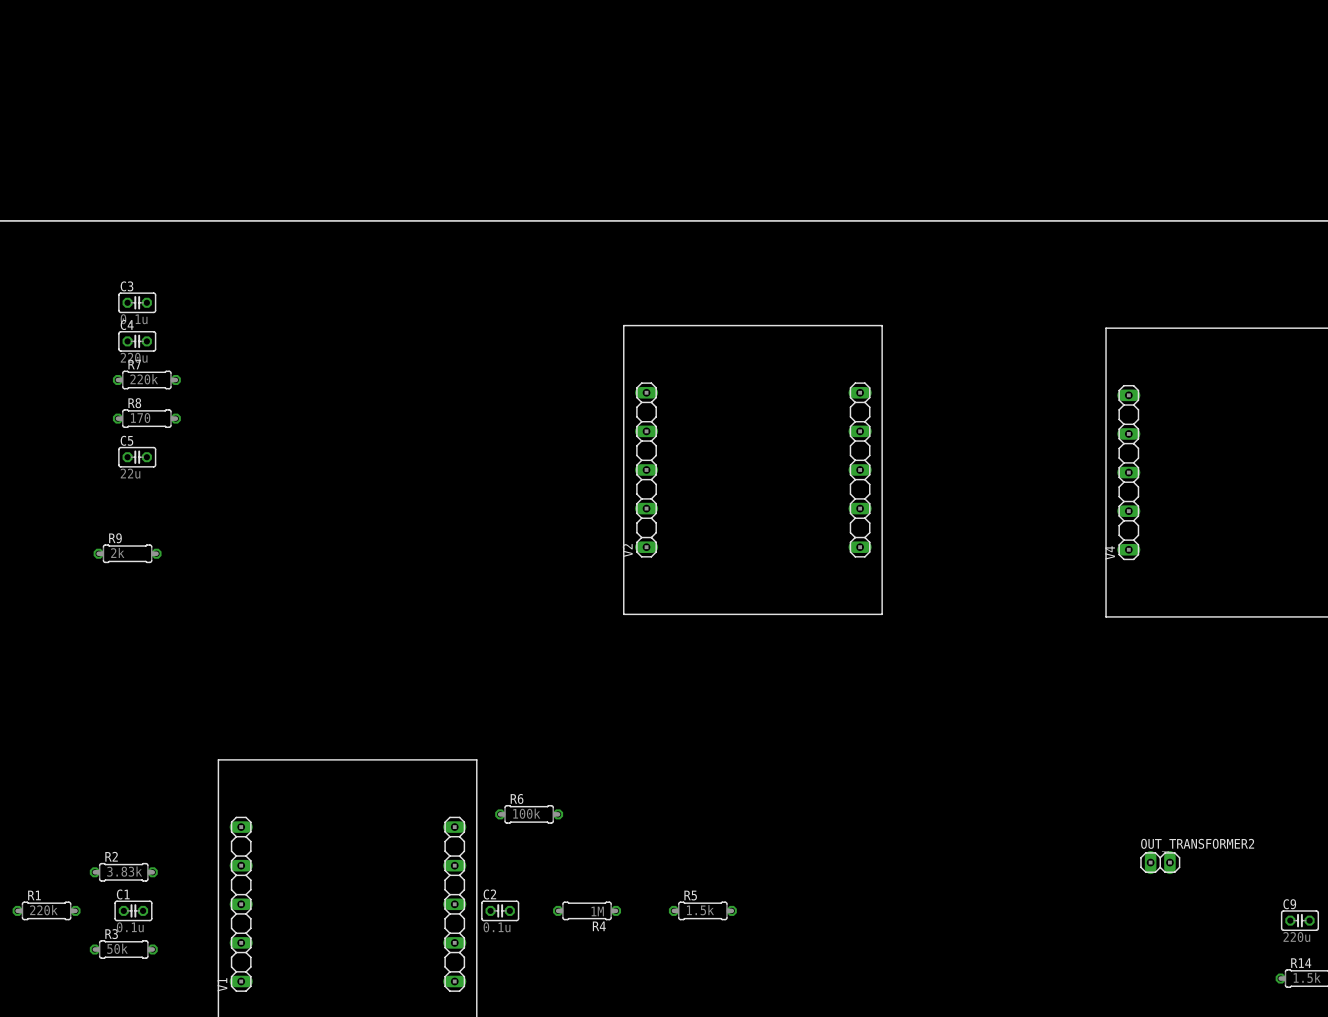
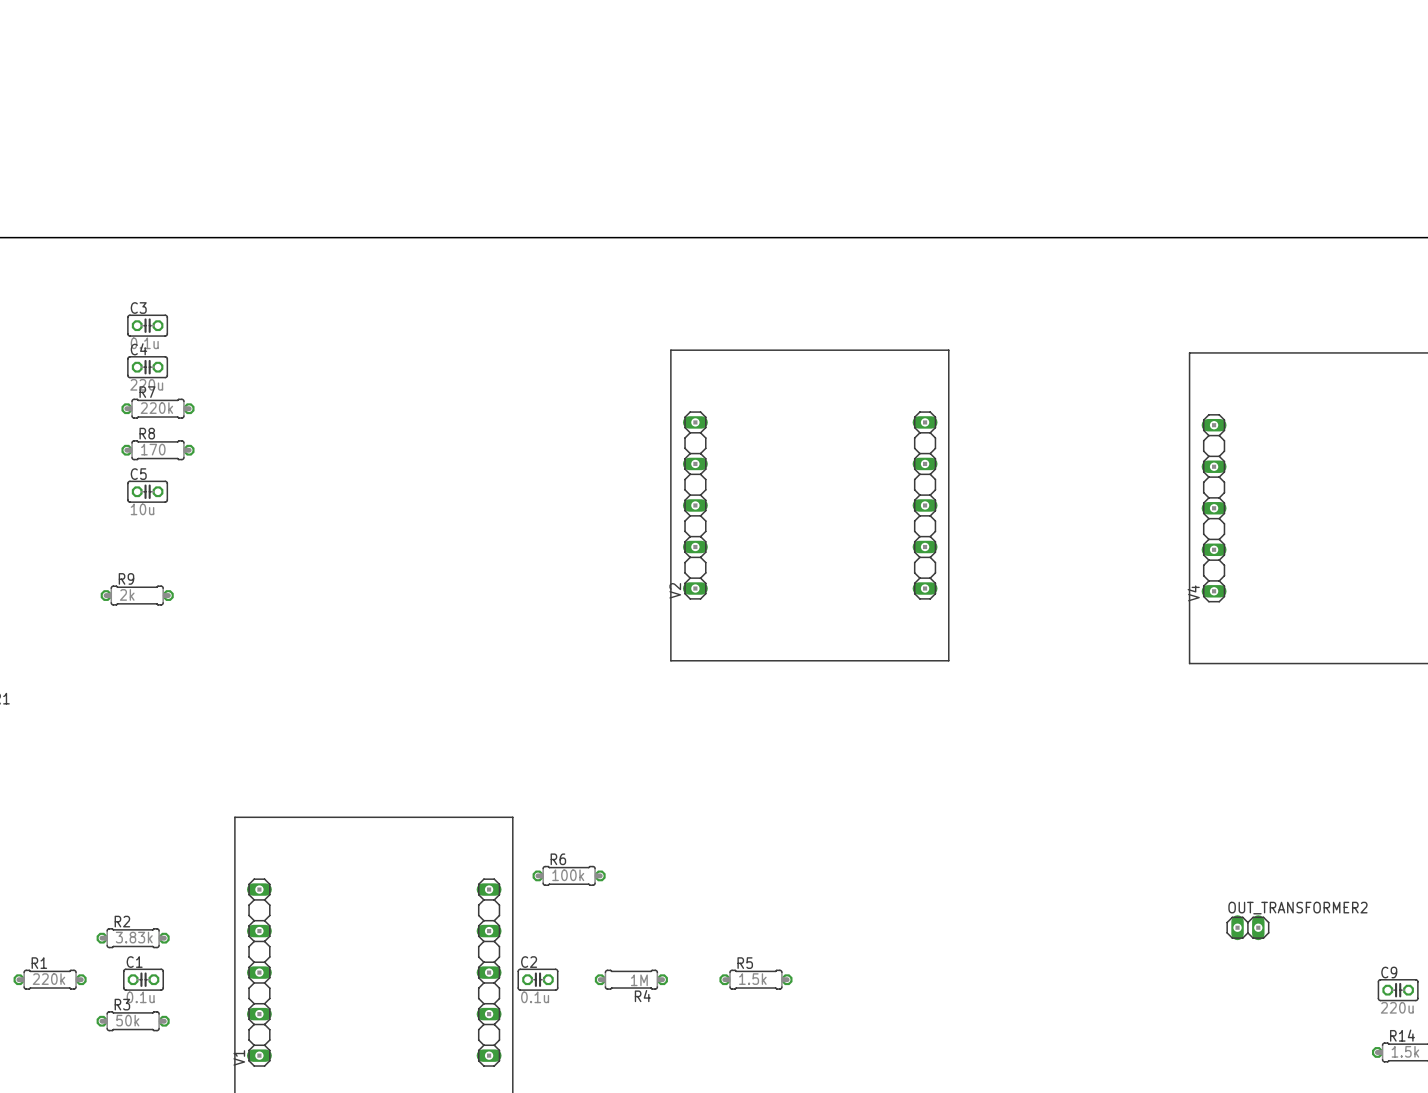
C5 value: 22u (130, 473) -> 10u (142, 509)

